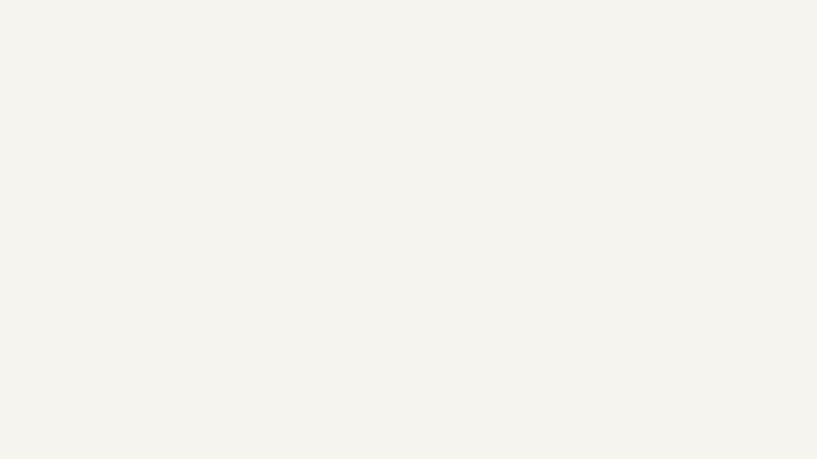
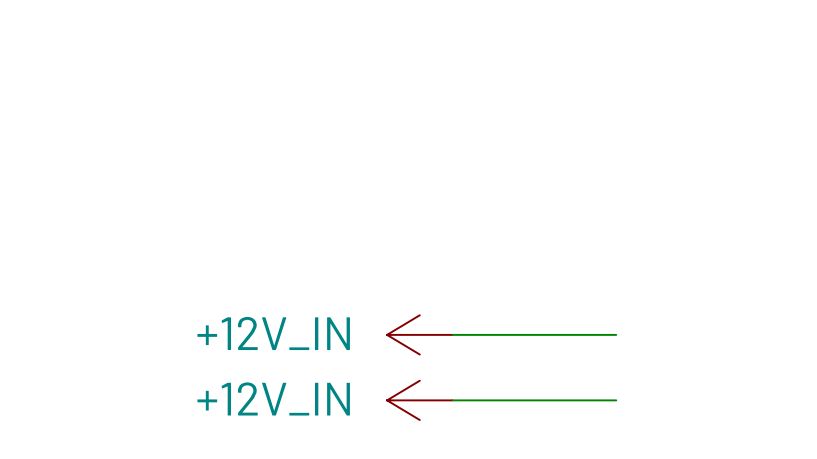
power symbol: none -> +12V_IN (419, 334)
wire: none -> (452, 334) (616, 334)
power symbol: none -> +12V_IN (419, 400)
wire: none -> (452, 400) (616, 400)

